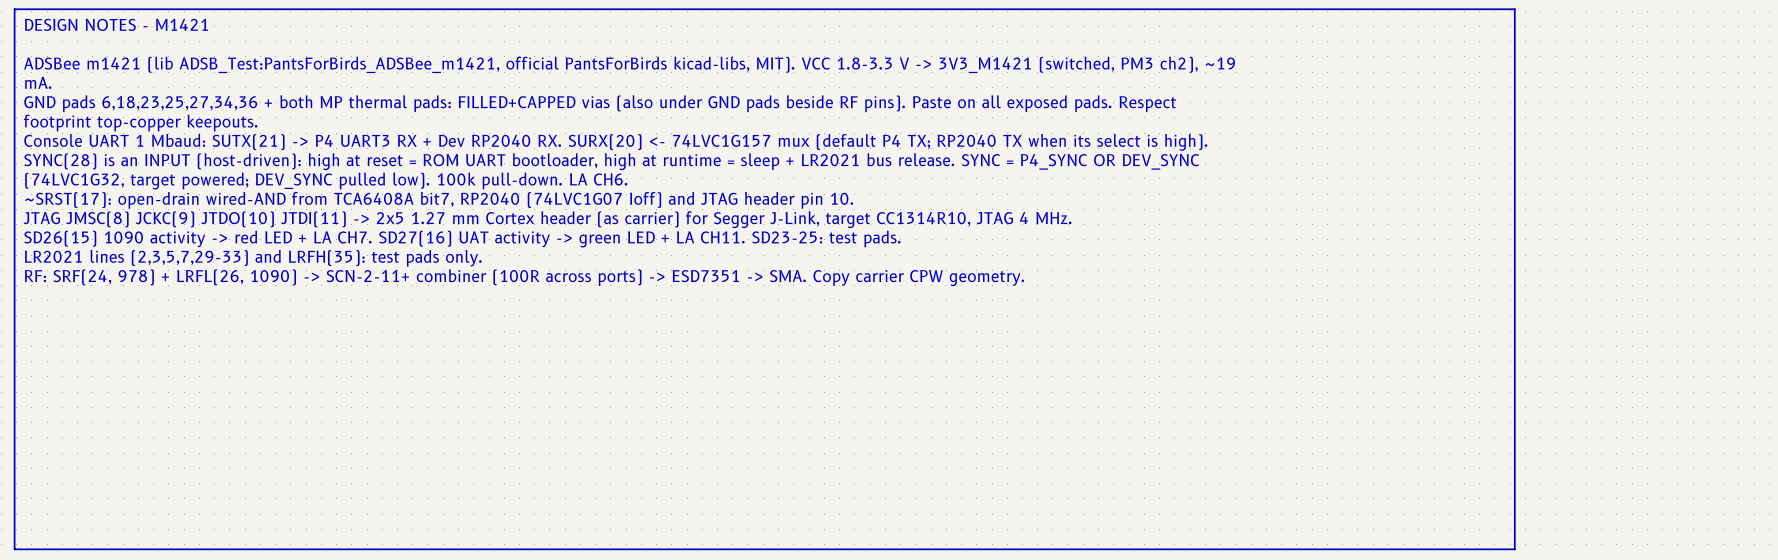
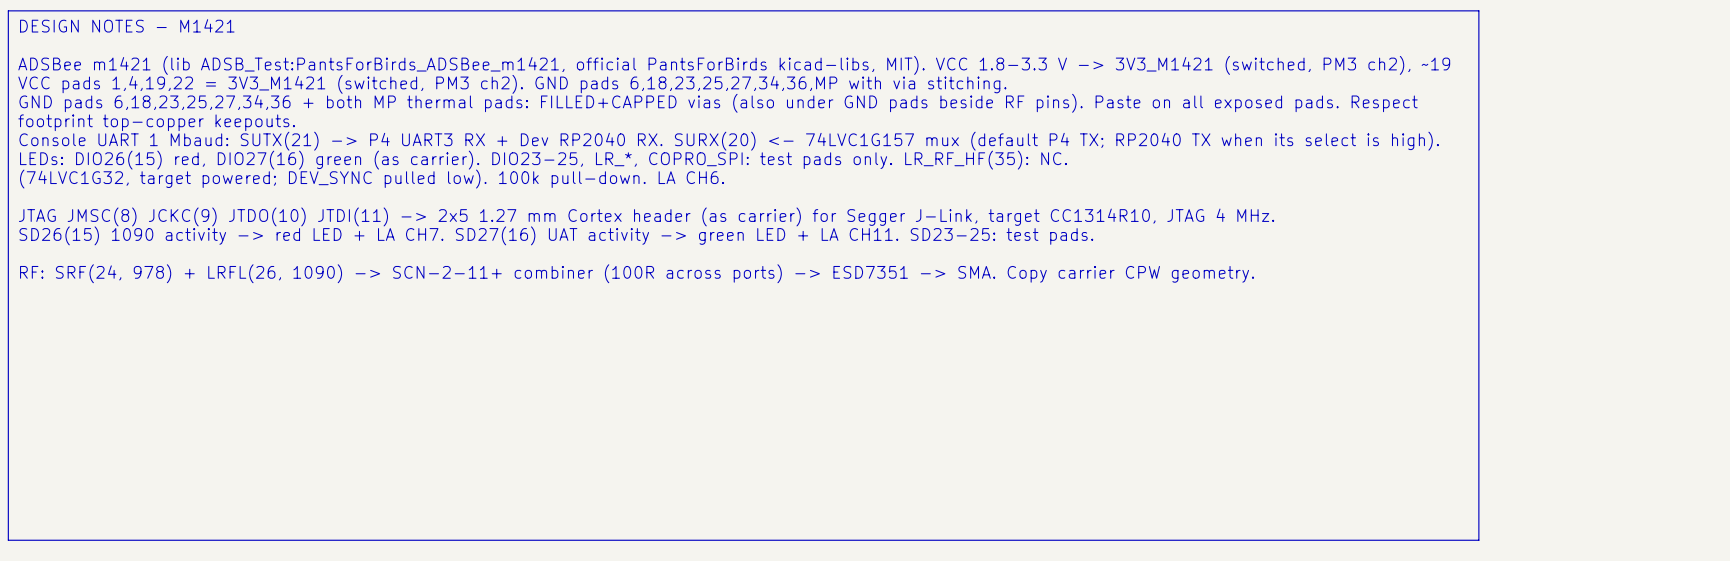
text: mA. (38, 82) -> VCC pads 1,4,19,22 = 3V3_M1421 (switched, PM3 ch2). GND pads 6,18,23,25,27,34,36,MP with via stitching. (512, 84)
text: SYNC(28) is an INPUT (host-driven): high at reset = ROM UART bootloader, high at runtime = sleep + LR2021 bus release. SYNC = P4_SYNC OR DEV_SYNC (611, 161) -> LEDs: DIO26(15) red, DIO27(16) green (as carrier). DIO23-25, LR_*, COPRO_SPI: test pads only. LR_RF_HF(35): NC. (543, 160)
text: ~SRST(17): open-drain wired-AND from TCA6408A bit7, RP2040 (74LVC1G07 Ioff) and JTAG header pin 10. (439, 200) -> none
text: LR2021 lines (2,3,5,7,29-33) and LRFH(35): test pads only. (253, 258) -> none

